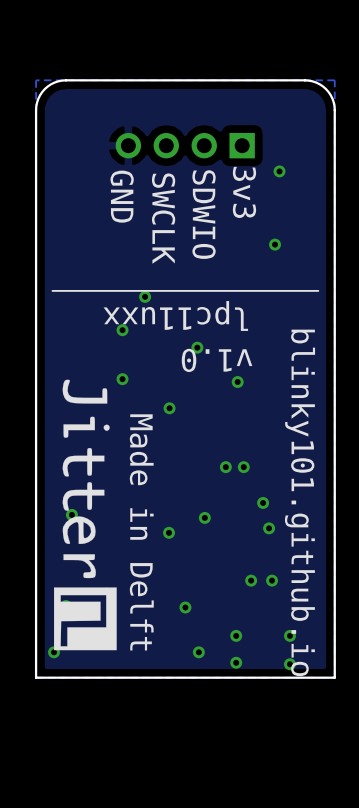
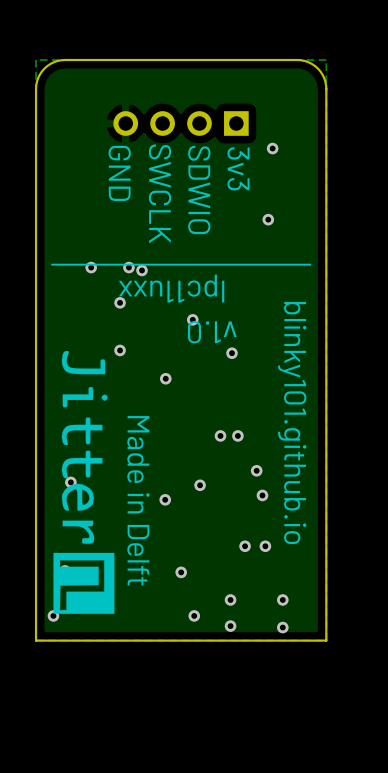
via: none -> (91, 267)
via: none -> (128, 267)

